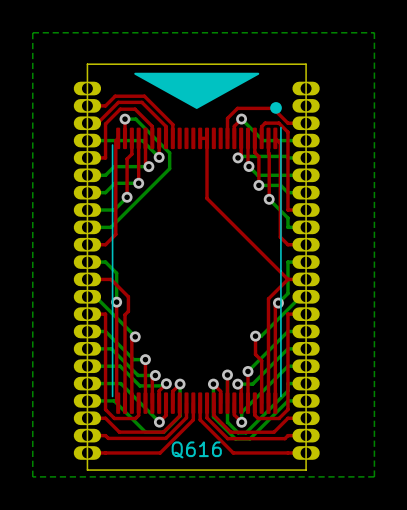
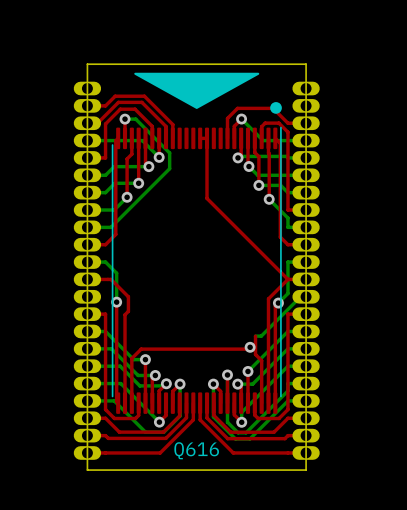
bottom zone outline: (32, 32) (374, 32) (374, 476) (32, 476) (32, 32) -> none
bottom track: (87, 296) (95, 296) (135, 336) -> none
top track: (135, 336) (131, 340) (131, 358) -> (250, 347) (250, 349) (141, 349) (131, 358)
via: (135, 336) -> none
via position: (255, 336) -> (250, 347)

